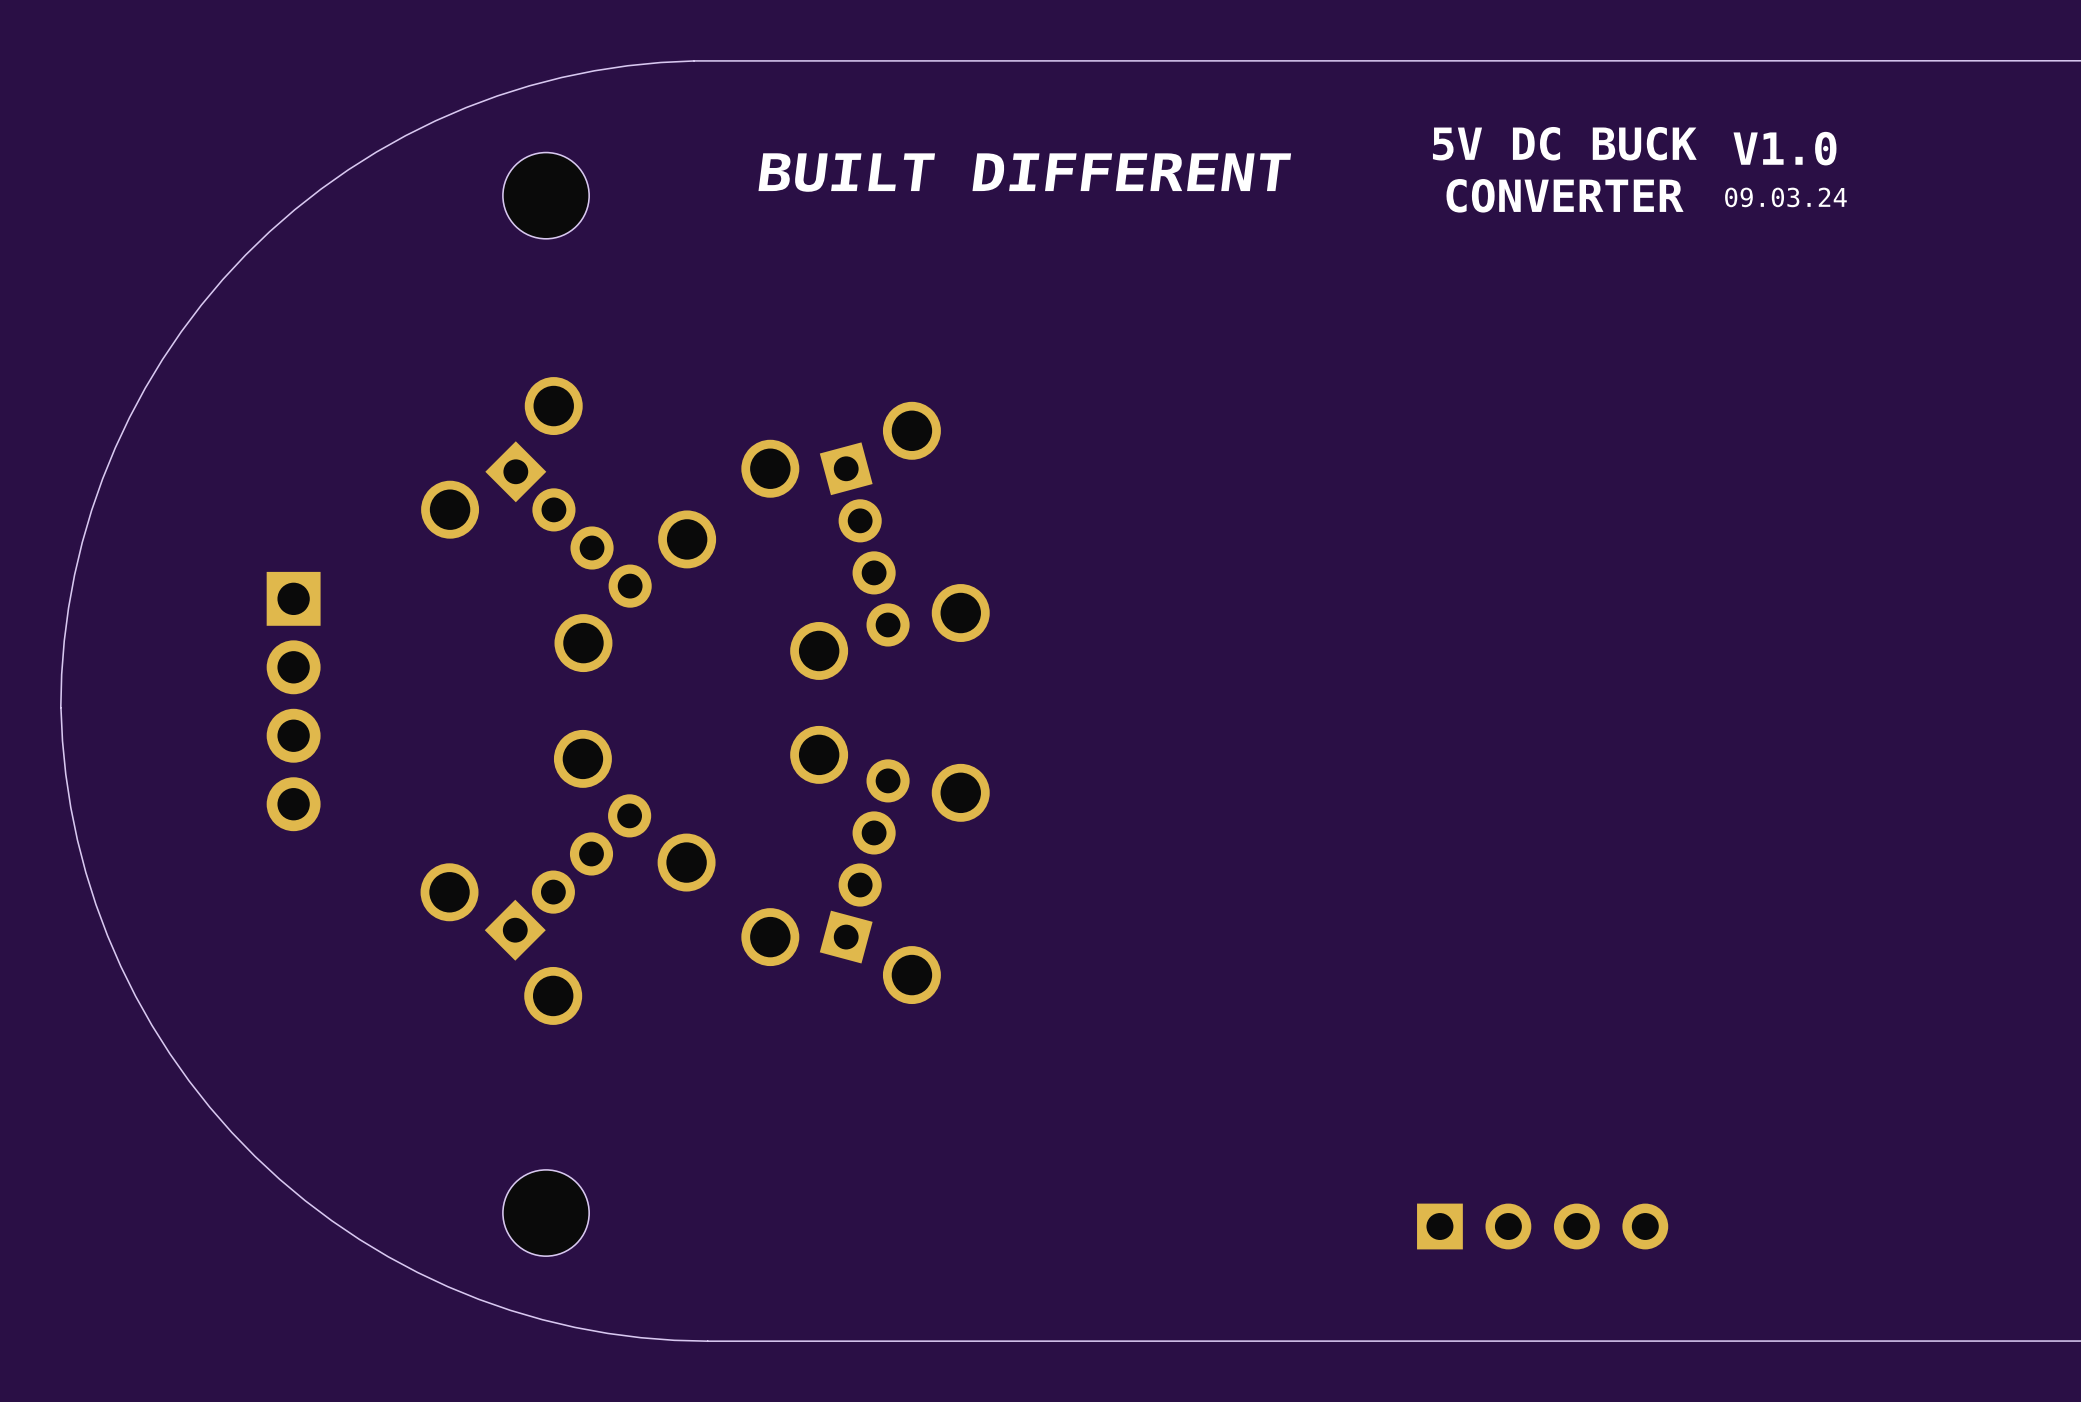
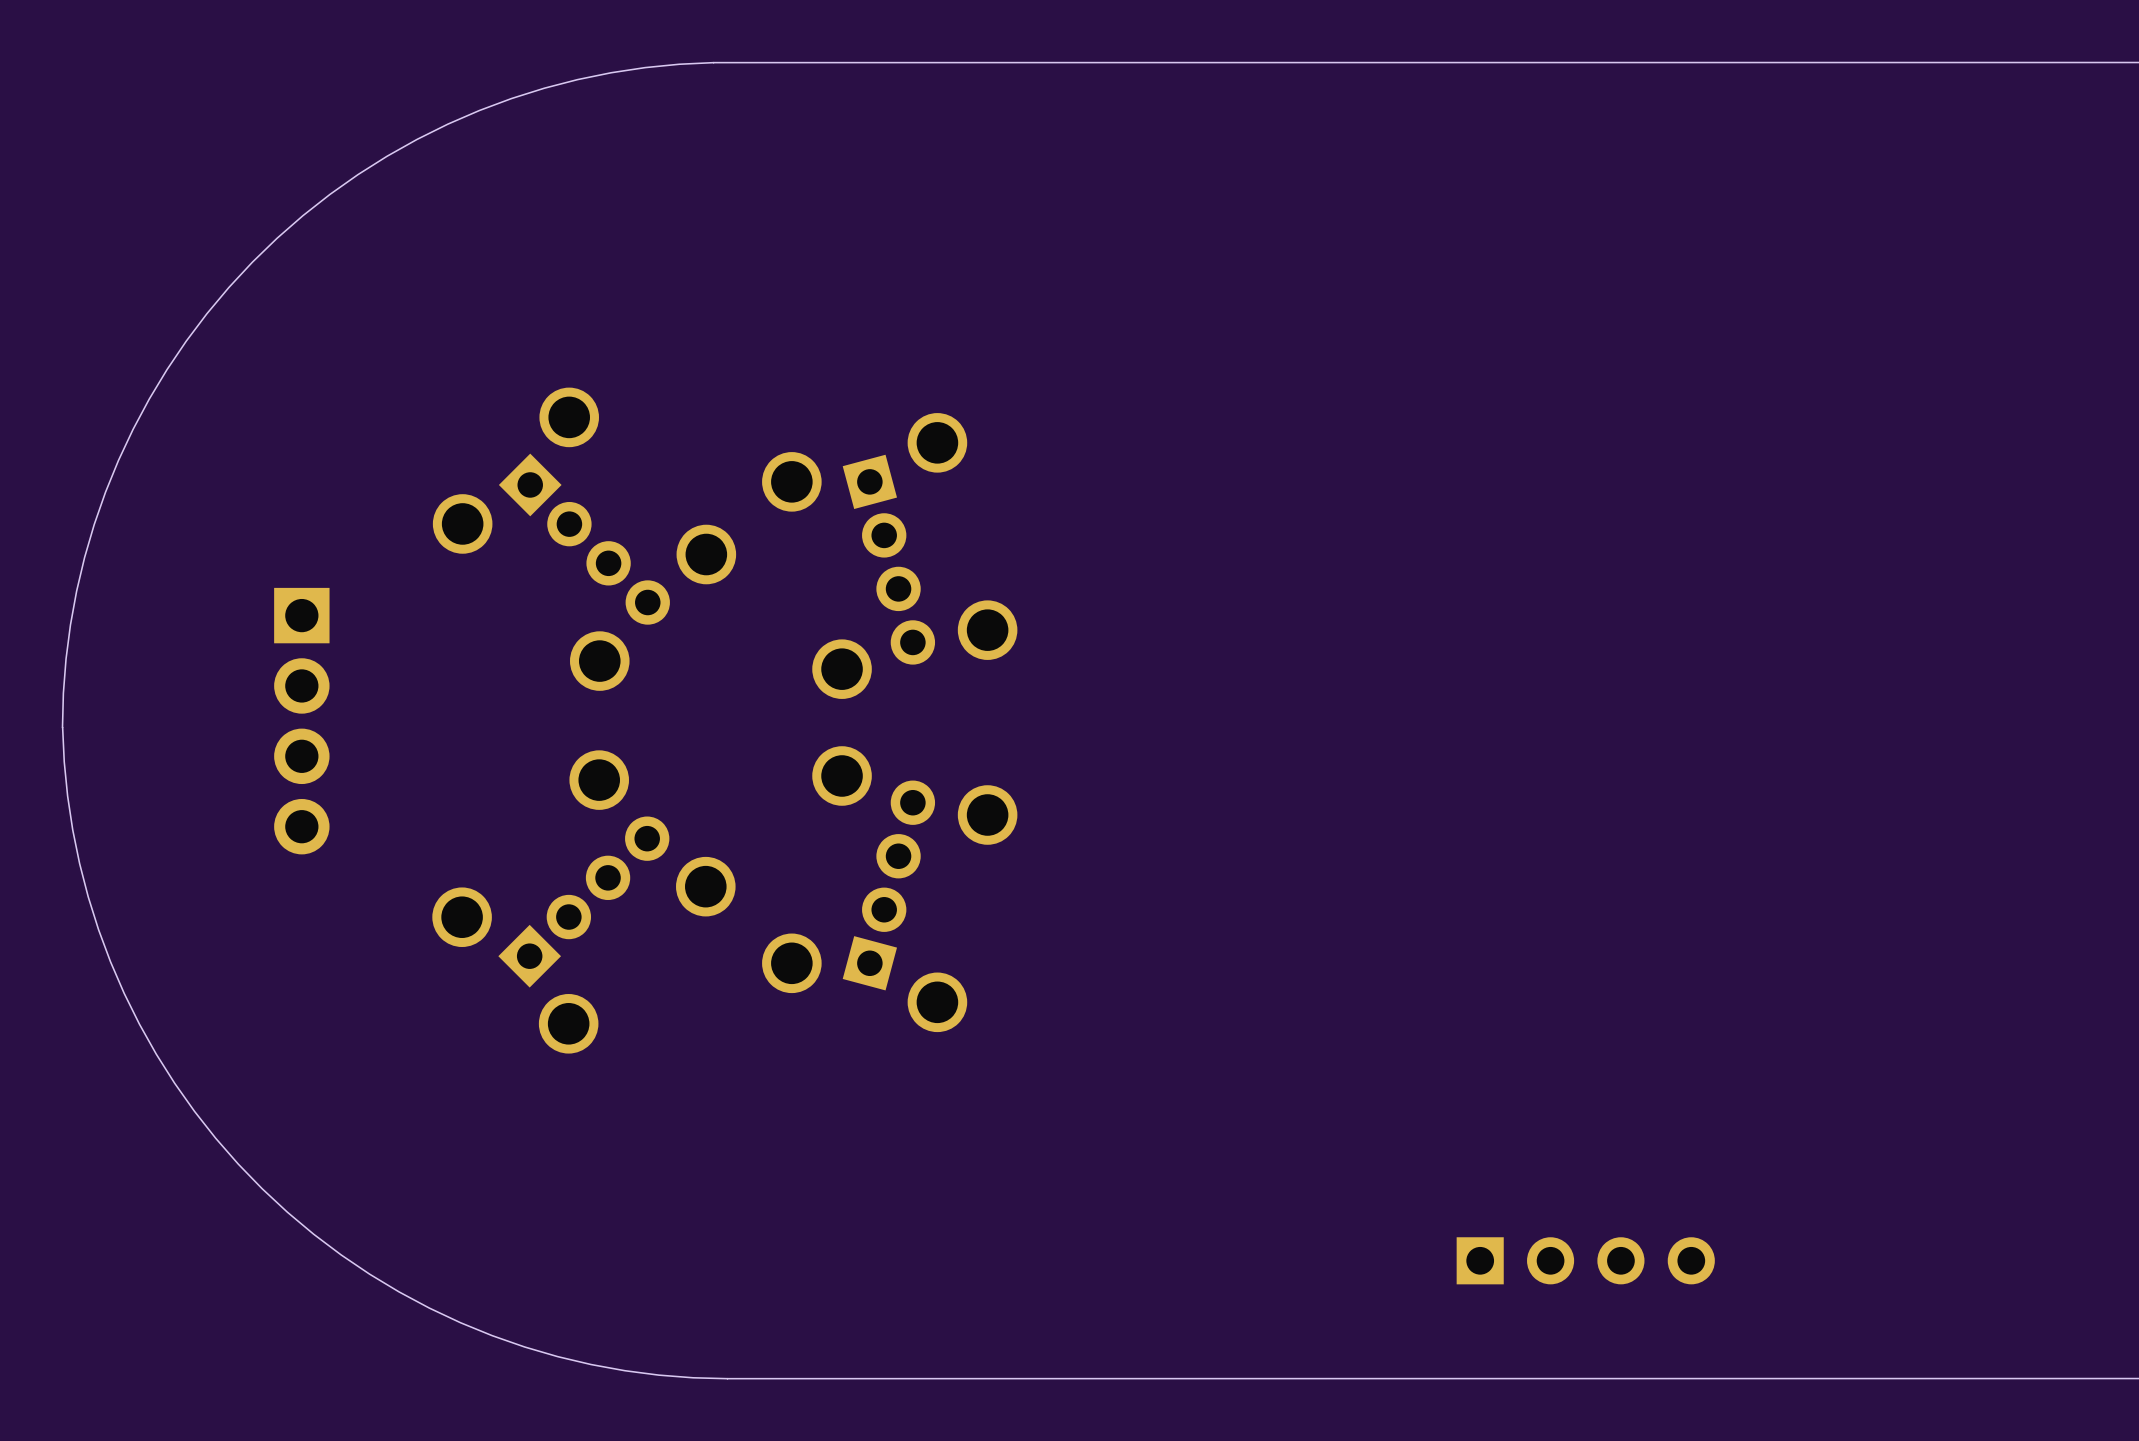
text: 5V DC BUCK (1564, 143) -> none
text: V1.0 (1785, 148) -> none
text: BUILT DIFFERENT (1024, 172) -> none
part: (546, 195) -> none
text: CONVERTER (1565, 195) -> none
text: 09.03.24 (1785, 197) -> none
part: (546, 1213) -> none

